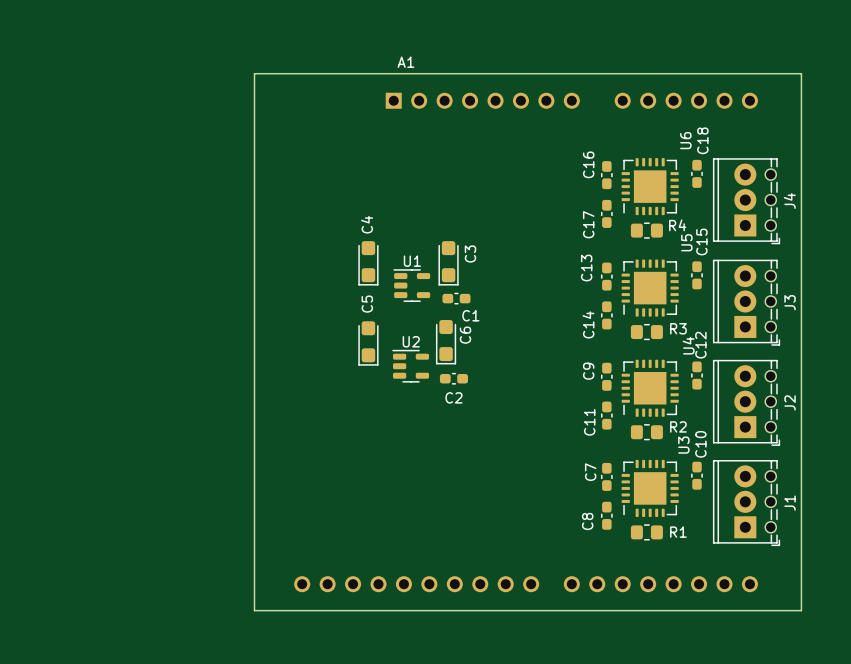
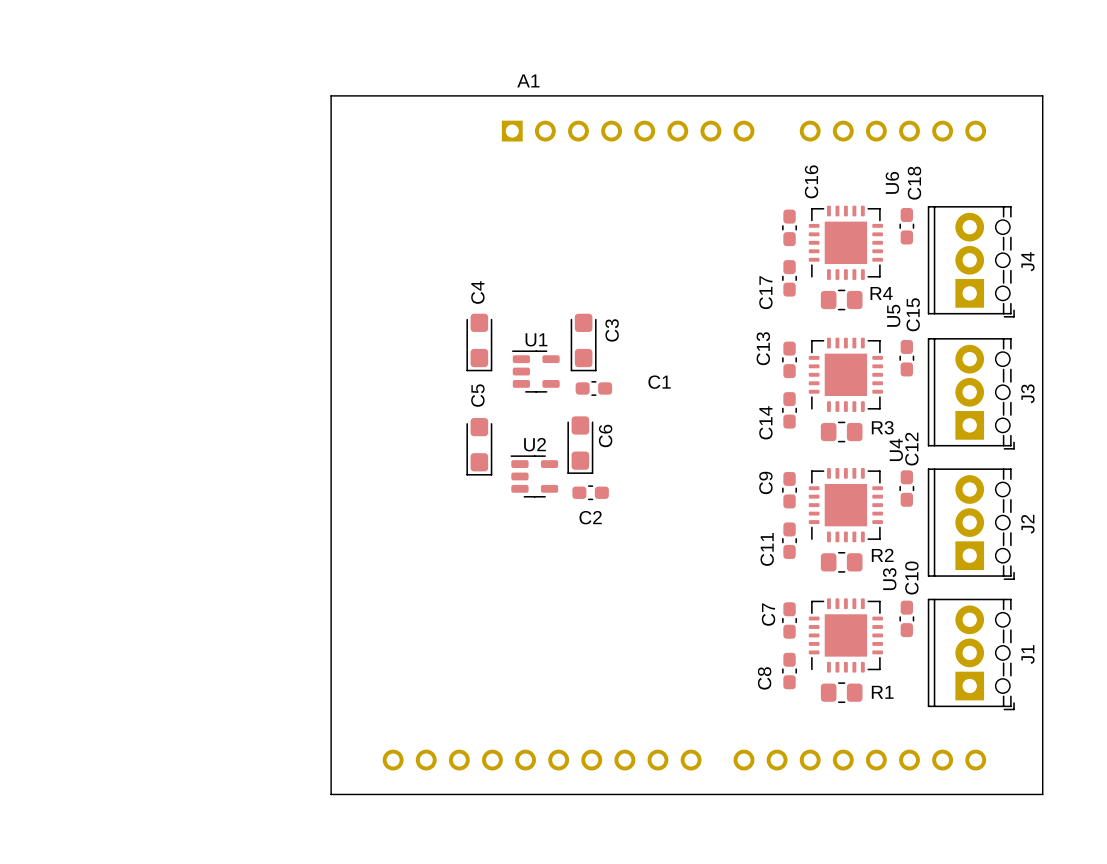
C16 name position: C16 (588, 164) -> C16 (811, 181)
C1 name position: C1 (470, 315) -> C1 (659, 382)

